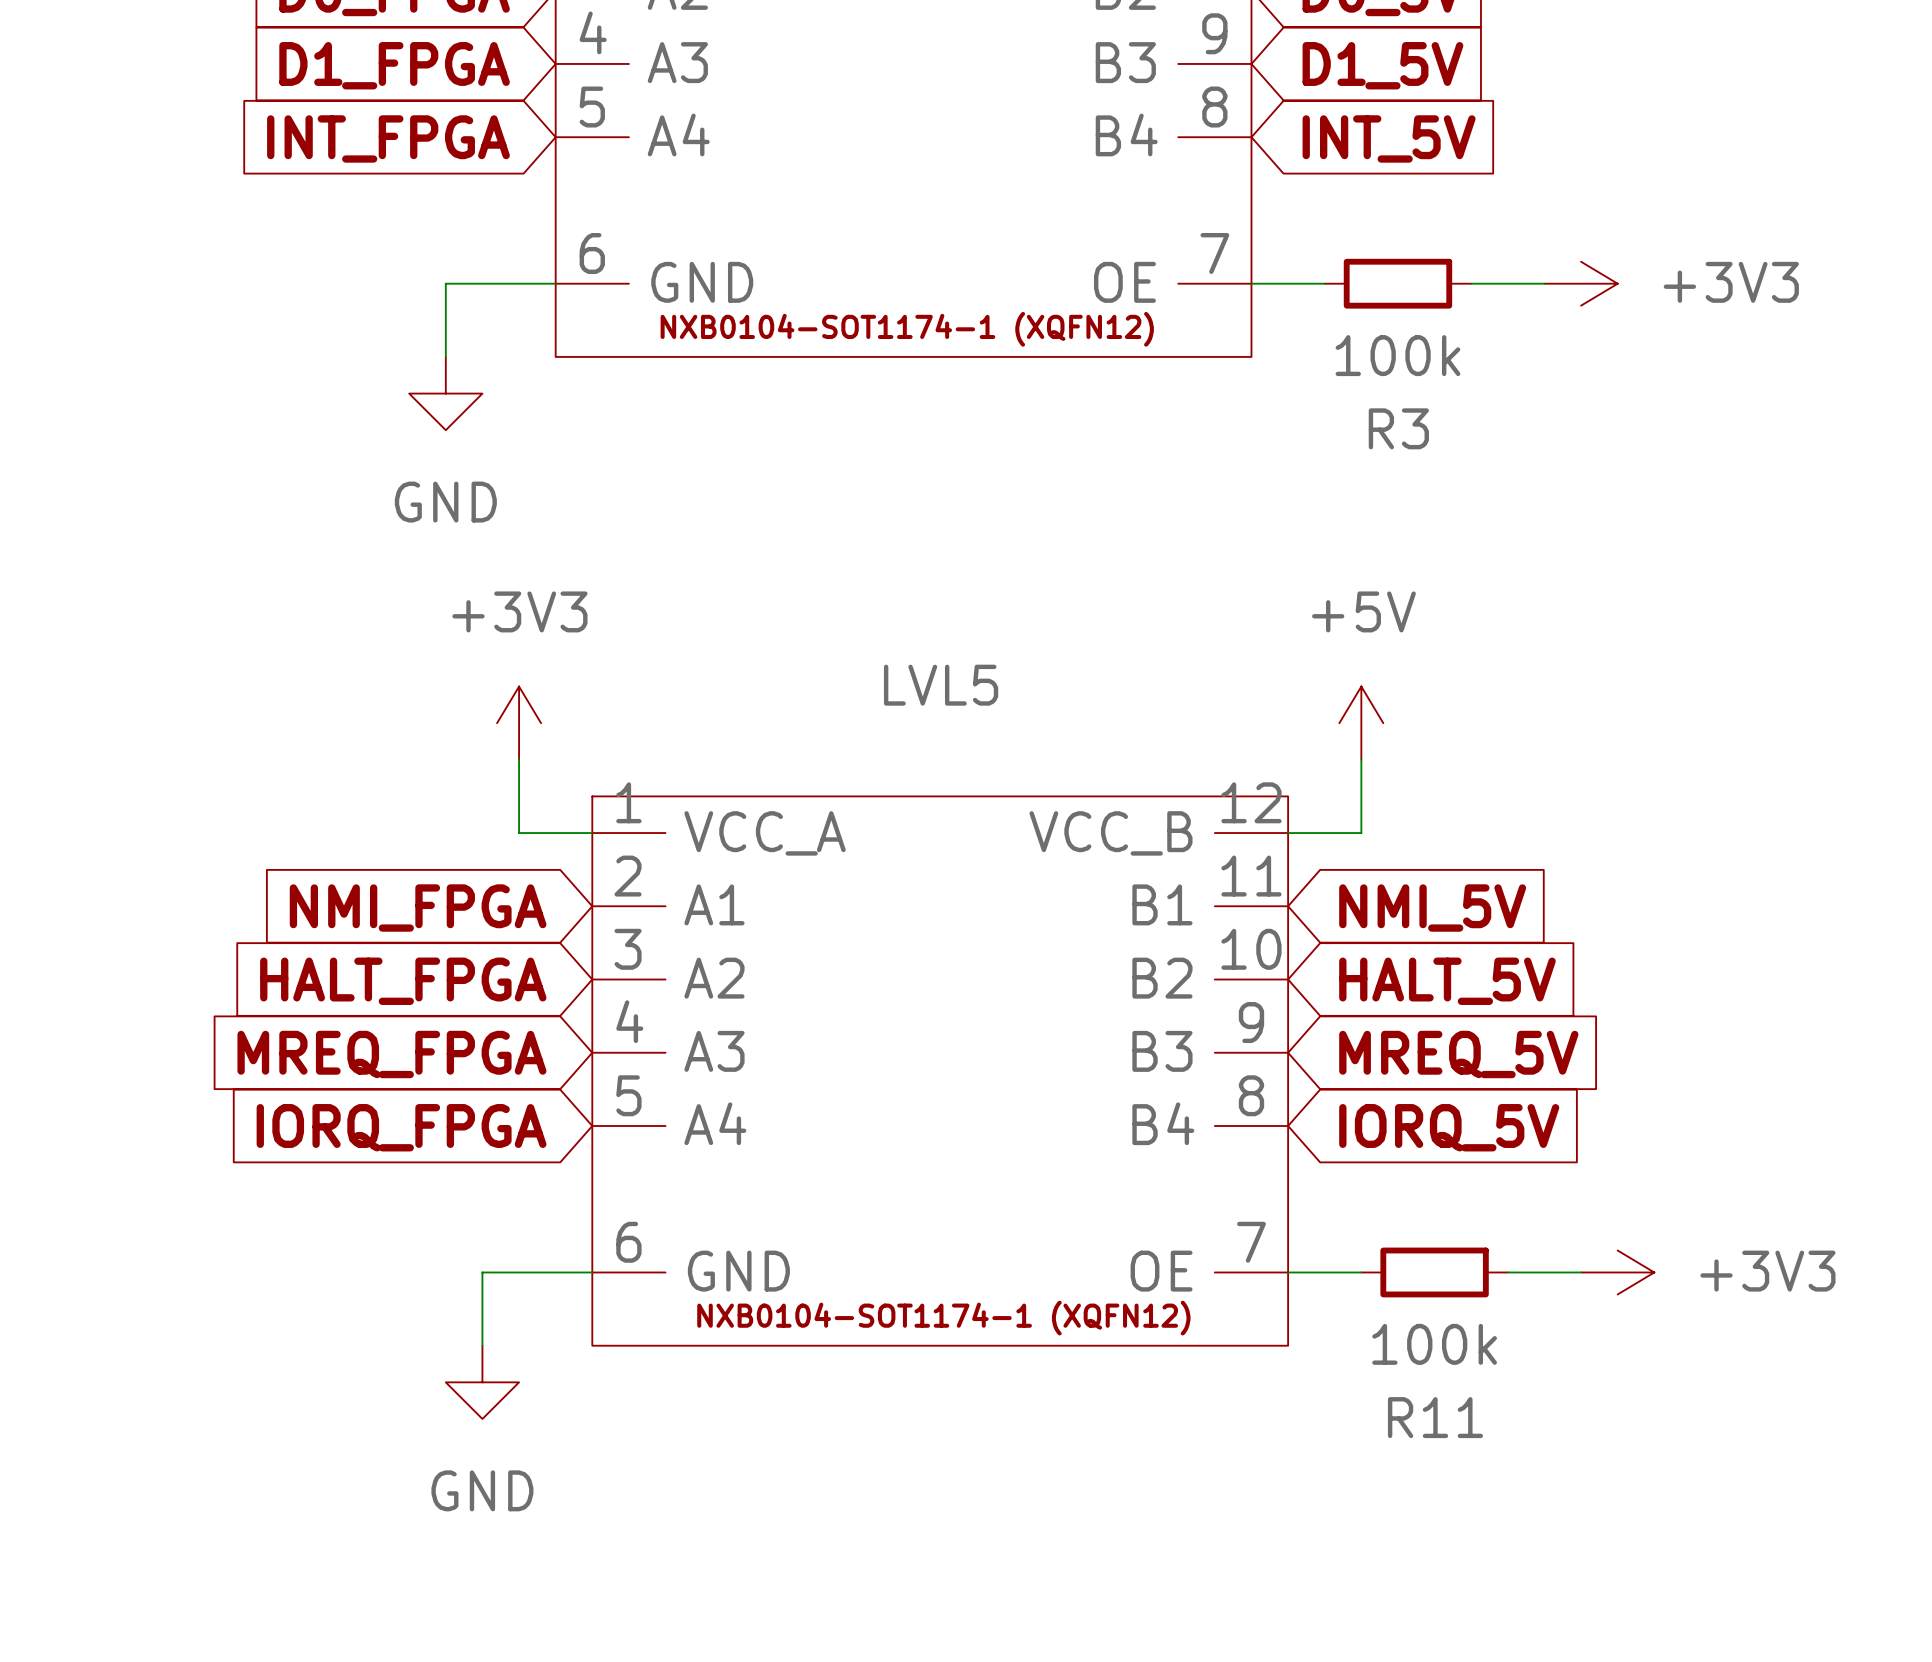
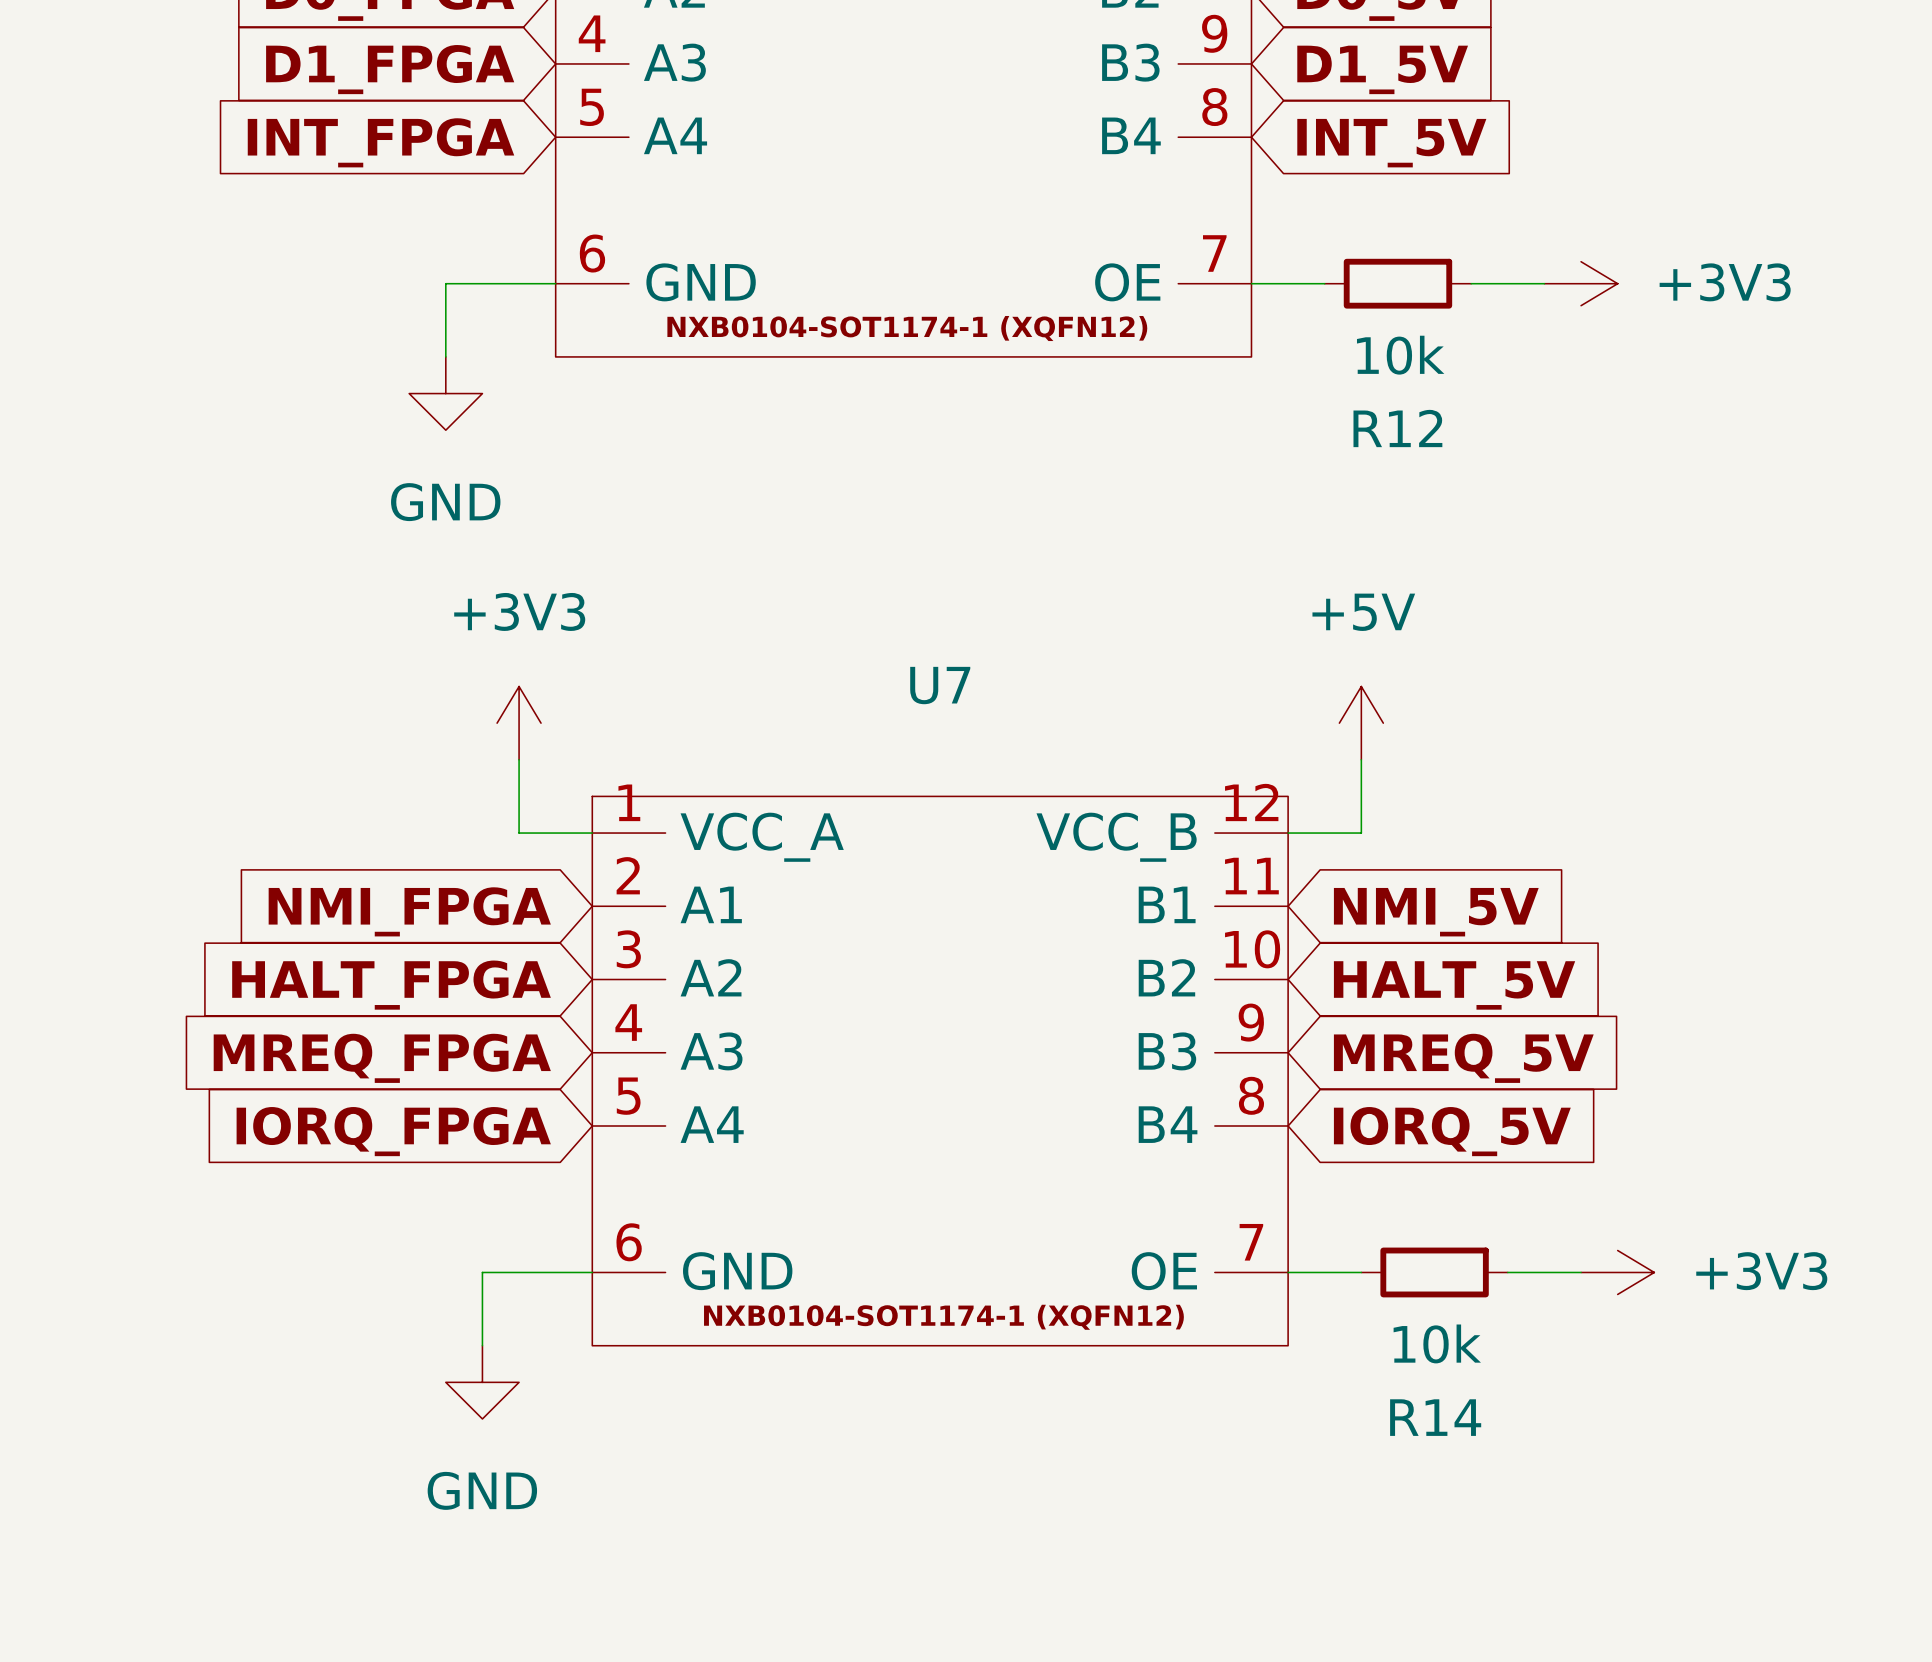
R3 value: 100k (1397, 355) -> 10k (1400, 355)
R3 name: R3 (1398, 428) -> R12 (1397, 428)
LVL5 name: LVL5 (941, 685) -> U7 (940, 685)
R11 value: 100k (1434, 1344) -> 10k (1437, 1343)
R11 name: R11 (1435, 1417) -> R14 (1435, 1417)

